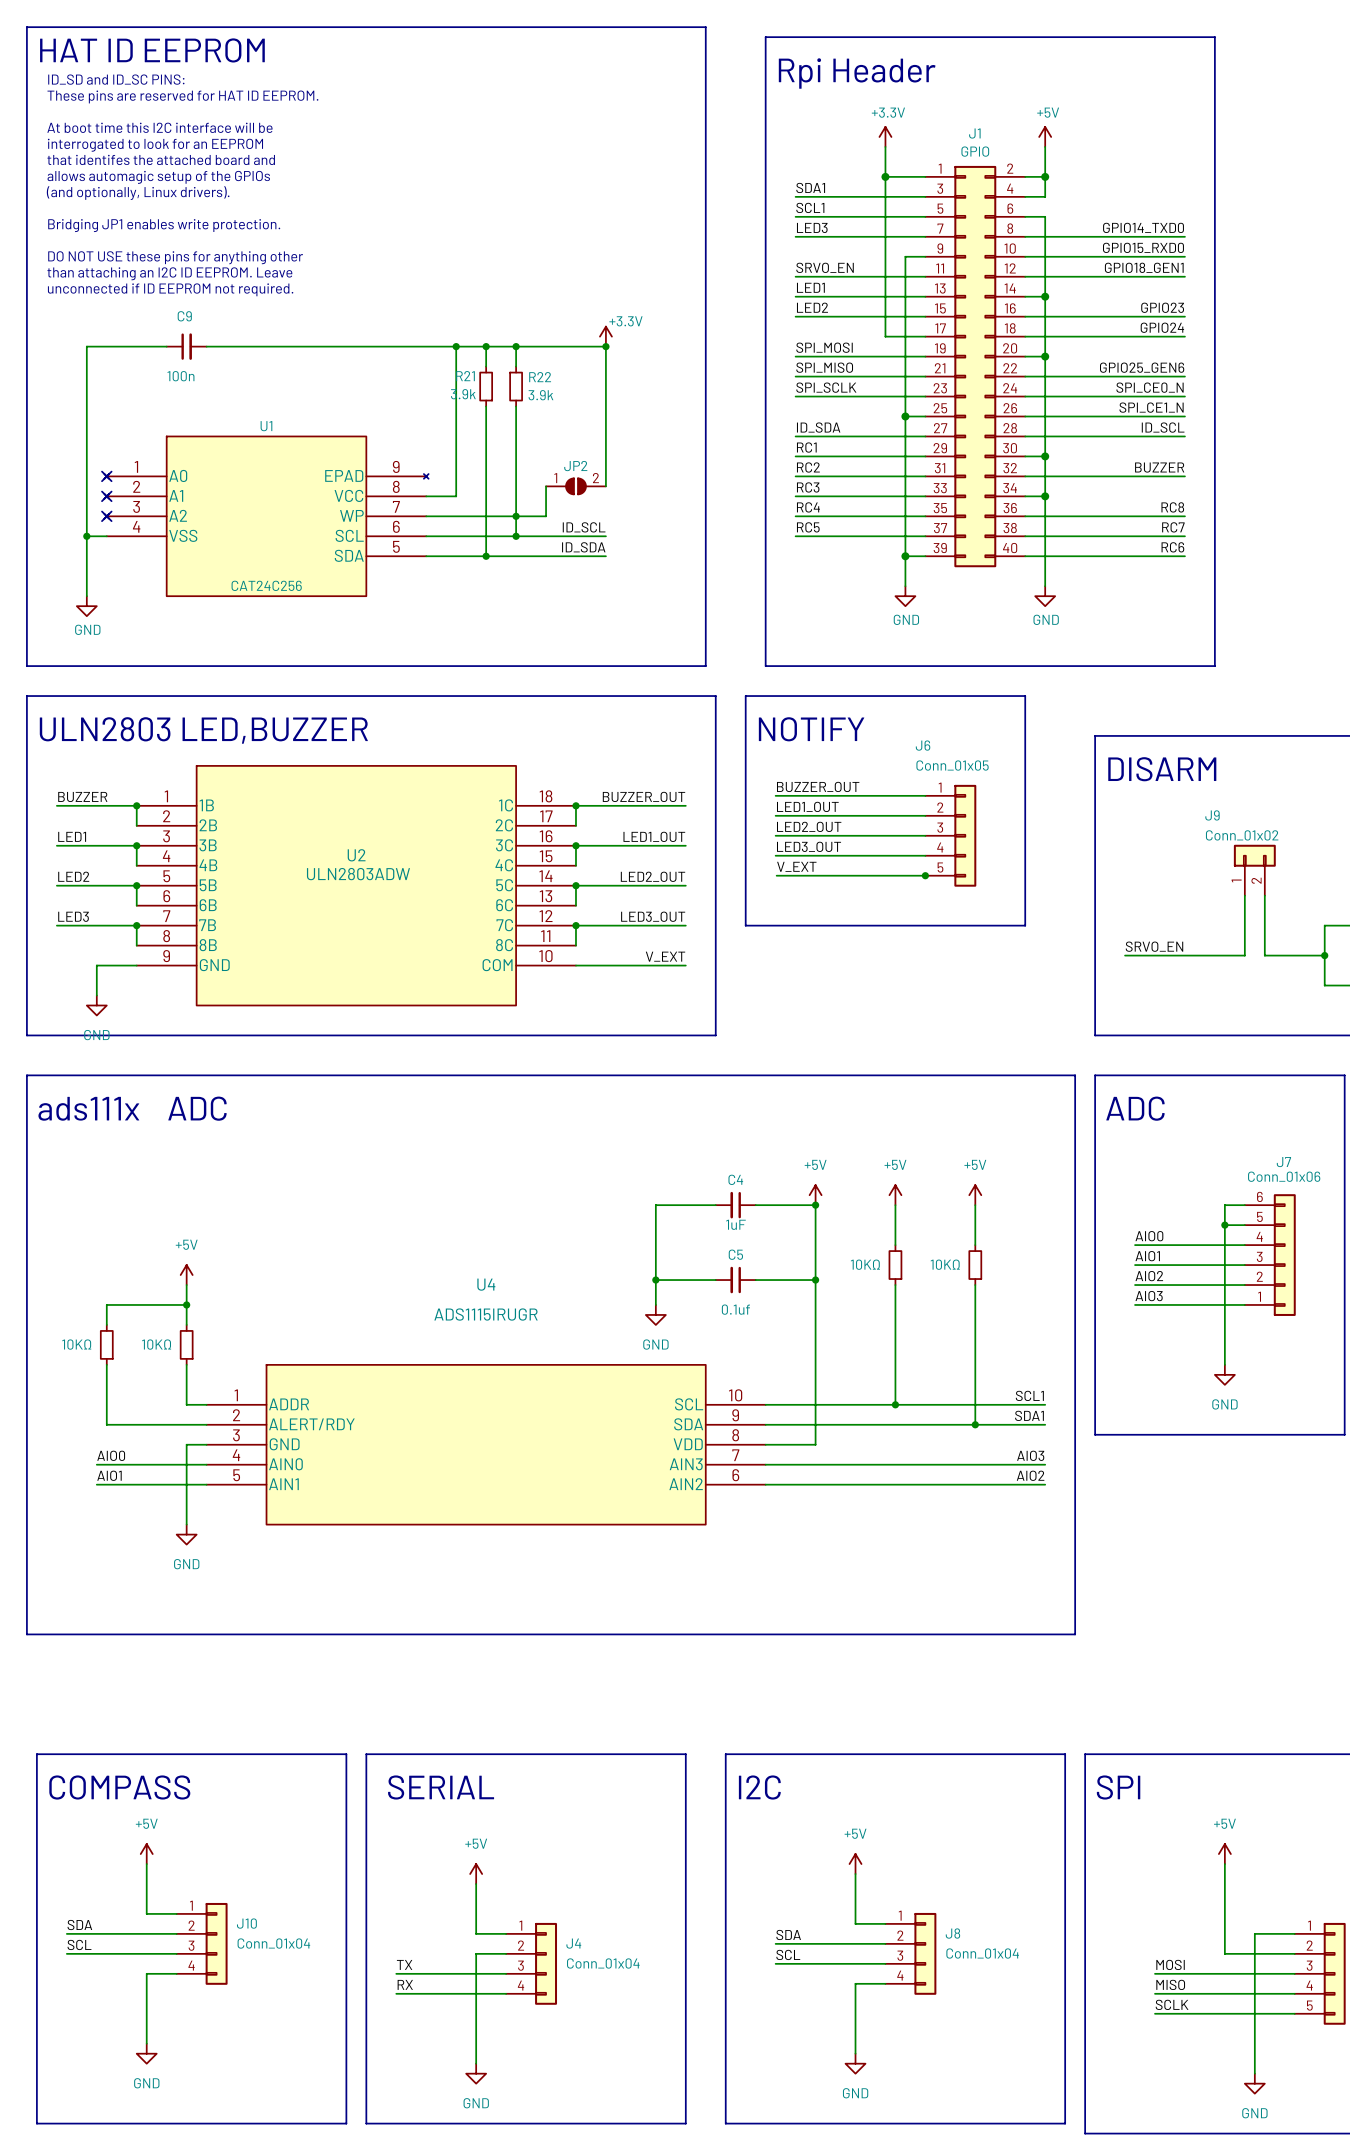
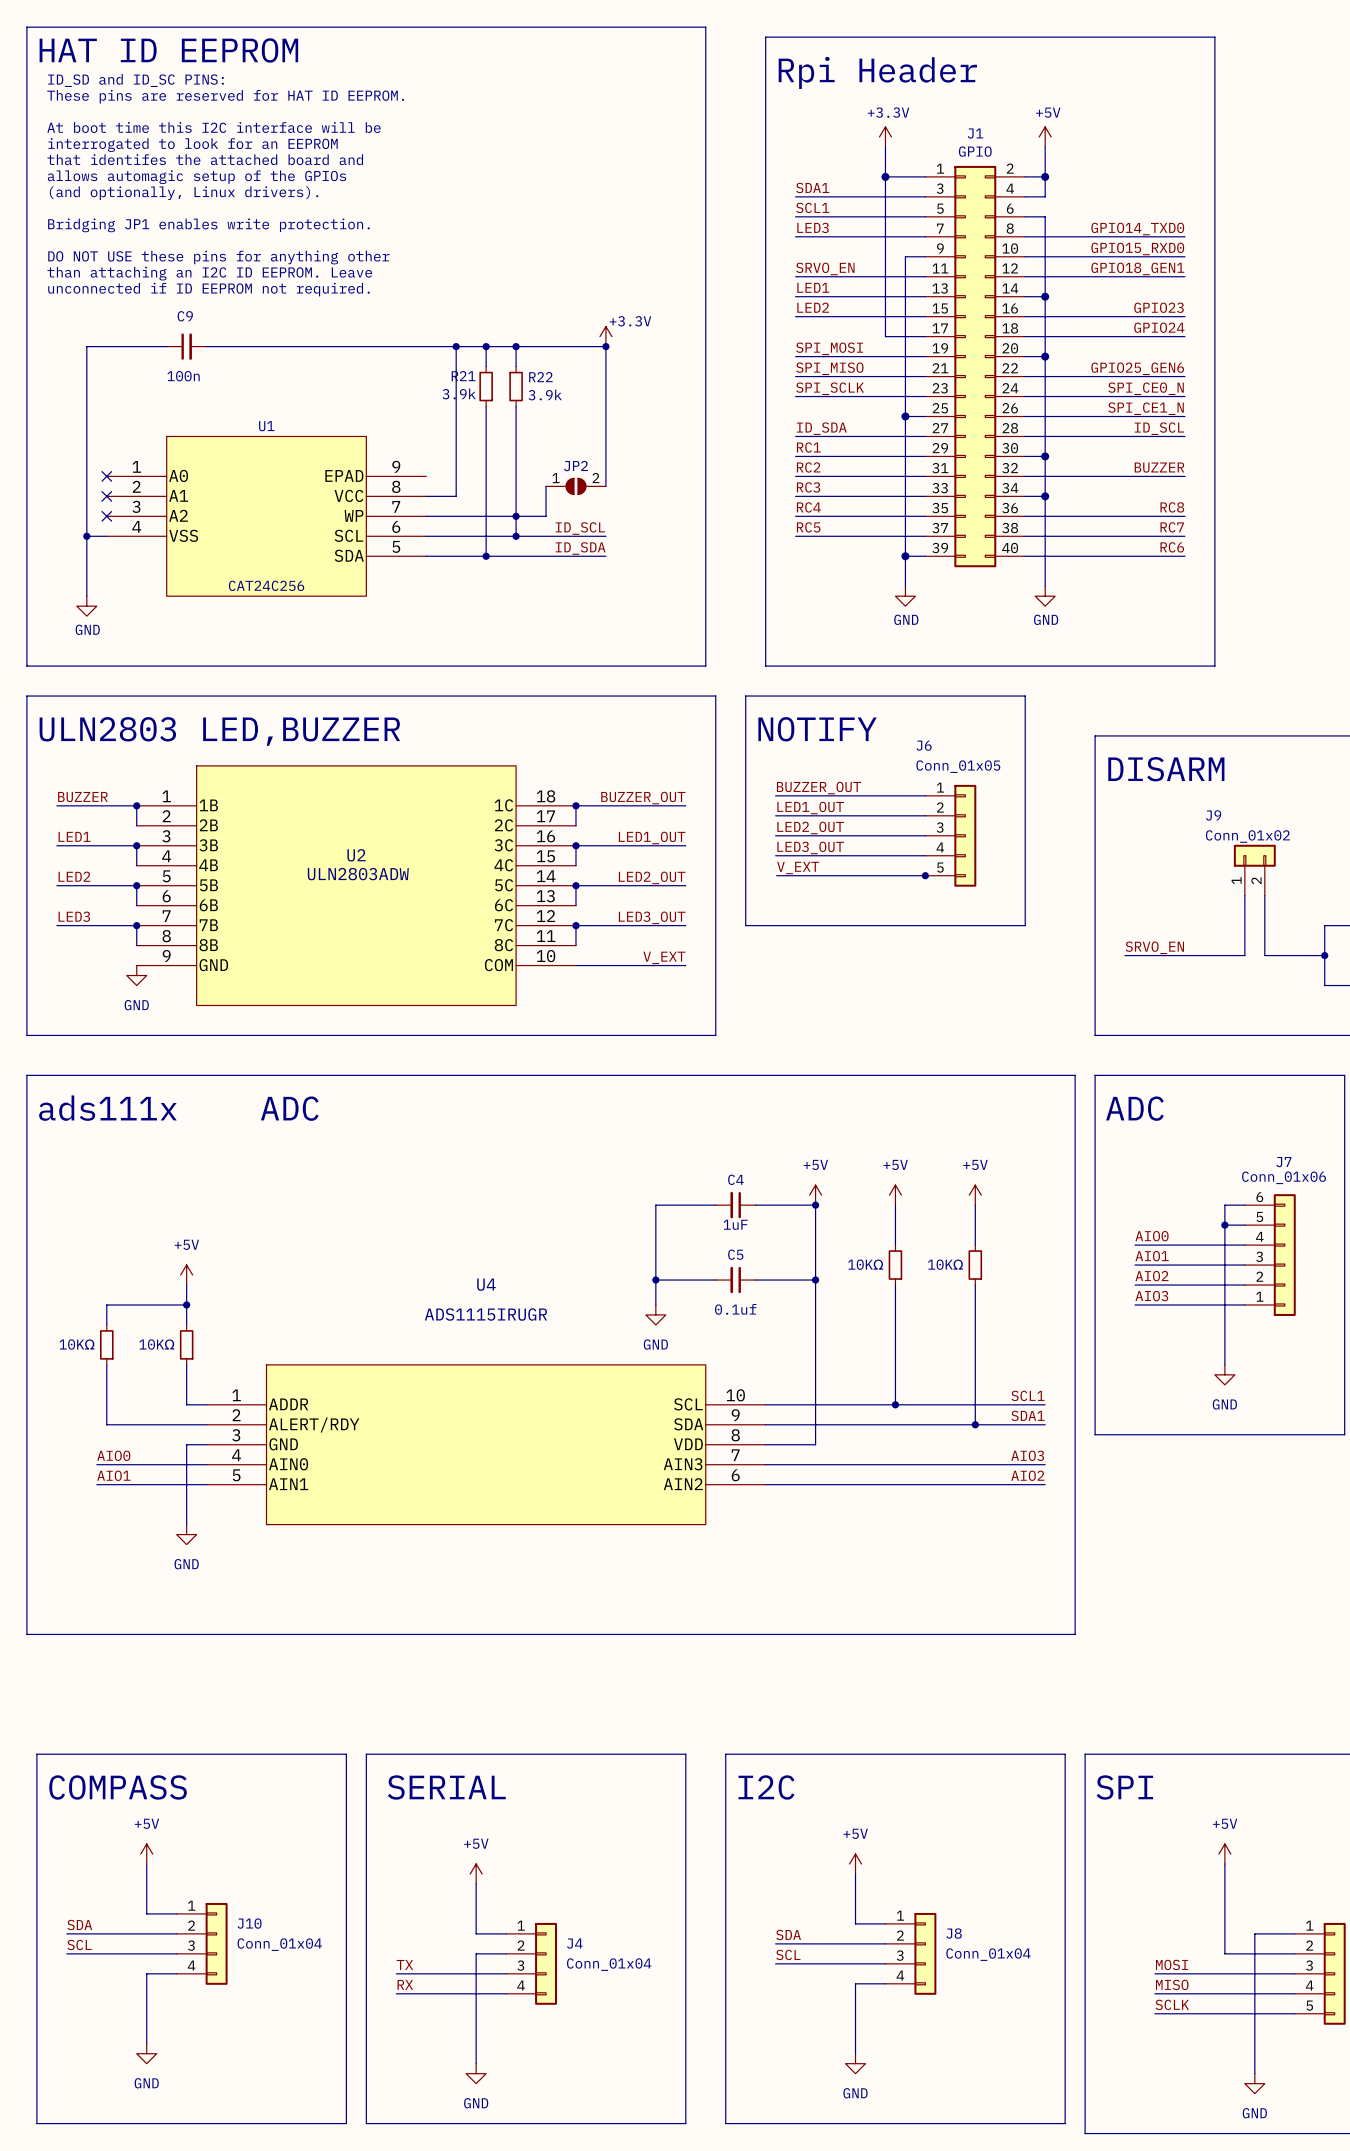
U1 symbol: [104, 436, 429, 597] -> [106, 436, 427, 597]
wire: (136, 965) (96, 965) (96, 995) -> none
power symbol position: GND (96, 1005) -> GND (136, 975)

